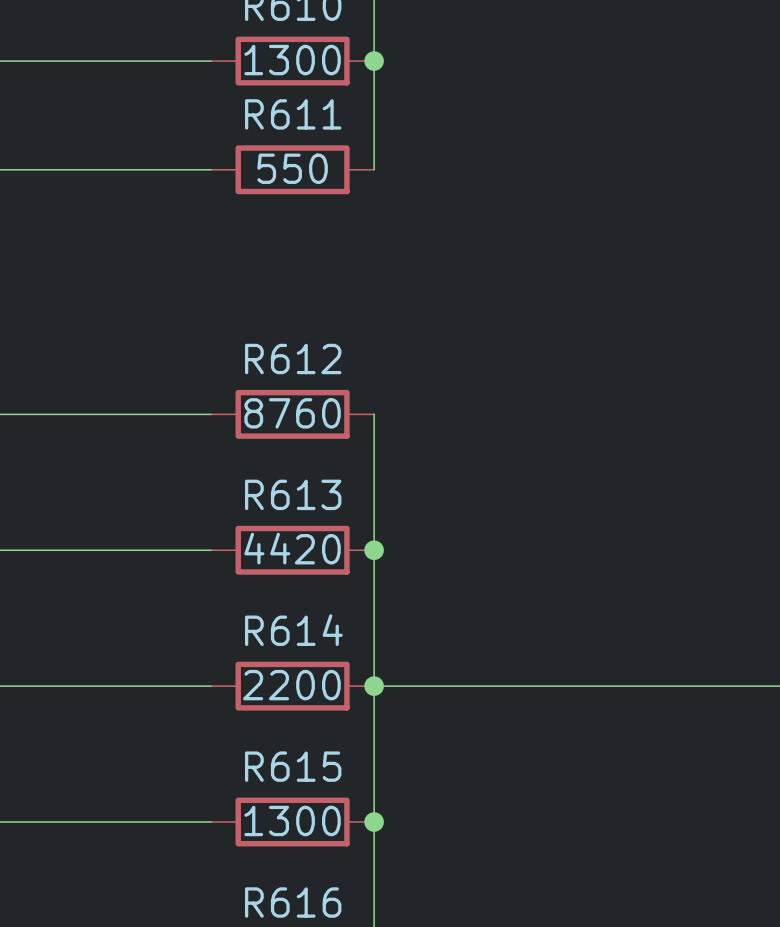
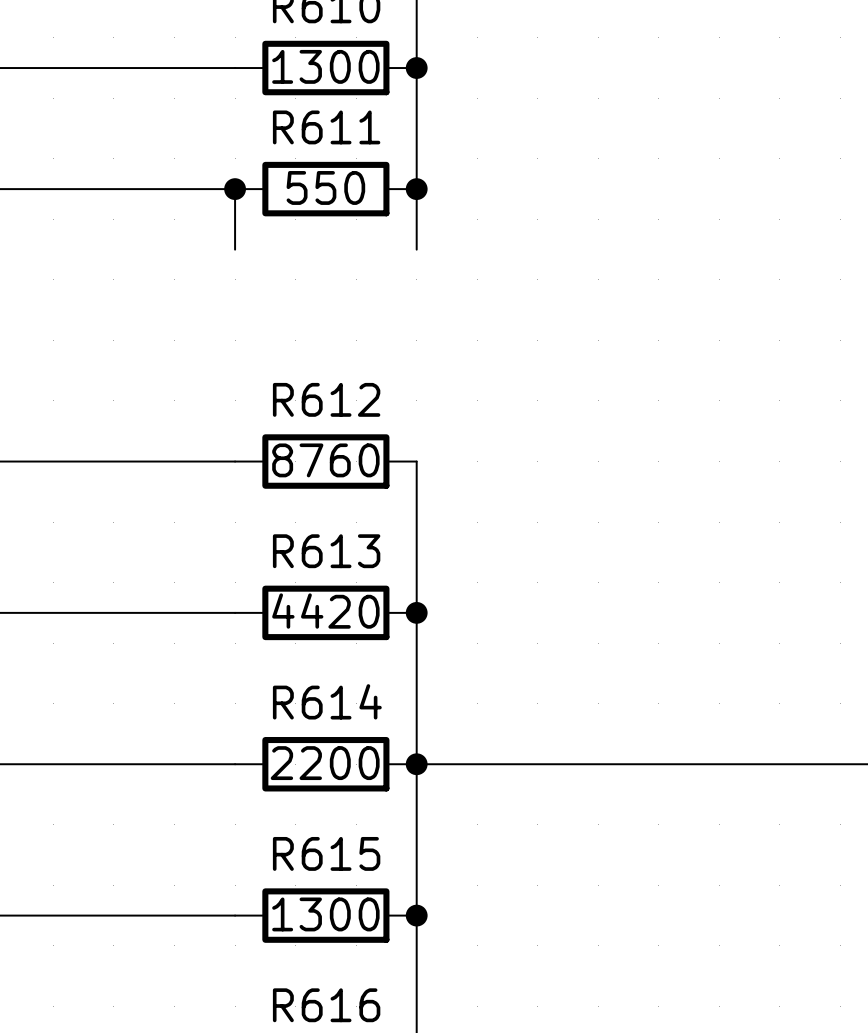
wire: none -> (235, 189) (235, 249)
junction: none -> (235, 189)
wire: none -> (416, 189) (416, 249)
junction: none -> (416, 189)

